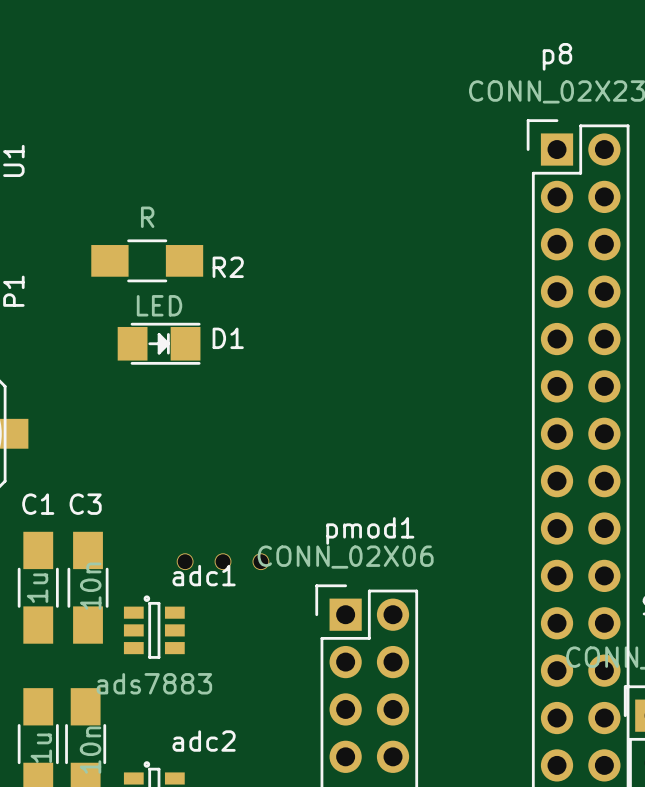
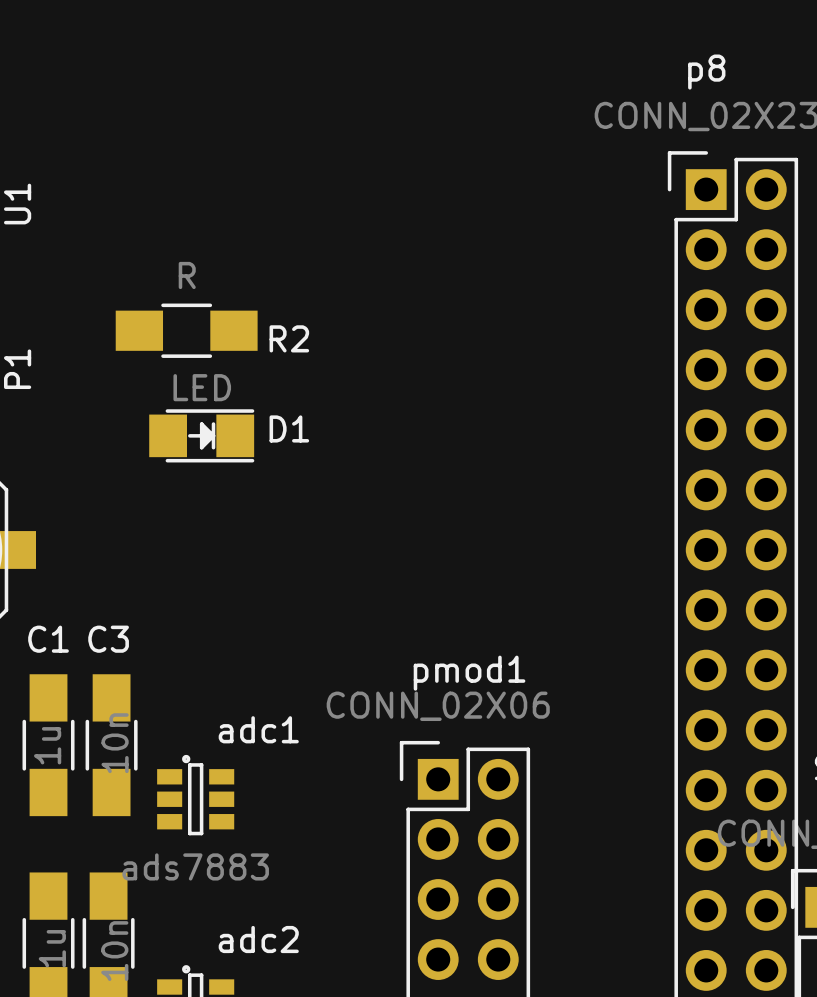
part: (185, 561) -> none
part: (223, 561) -> none
part: (260, 561) -> none

